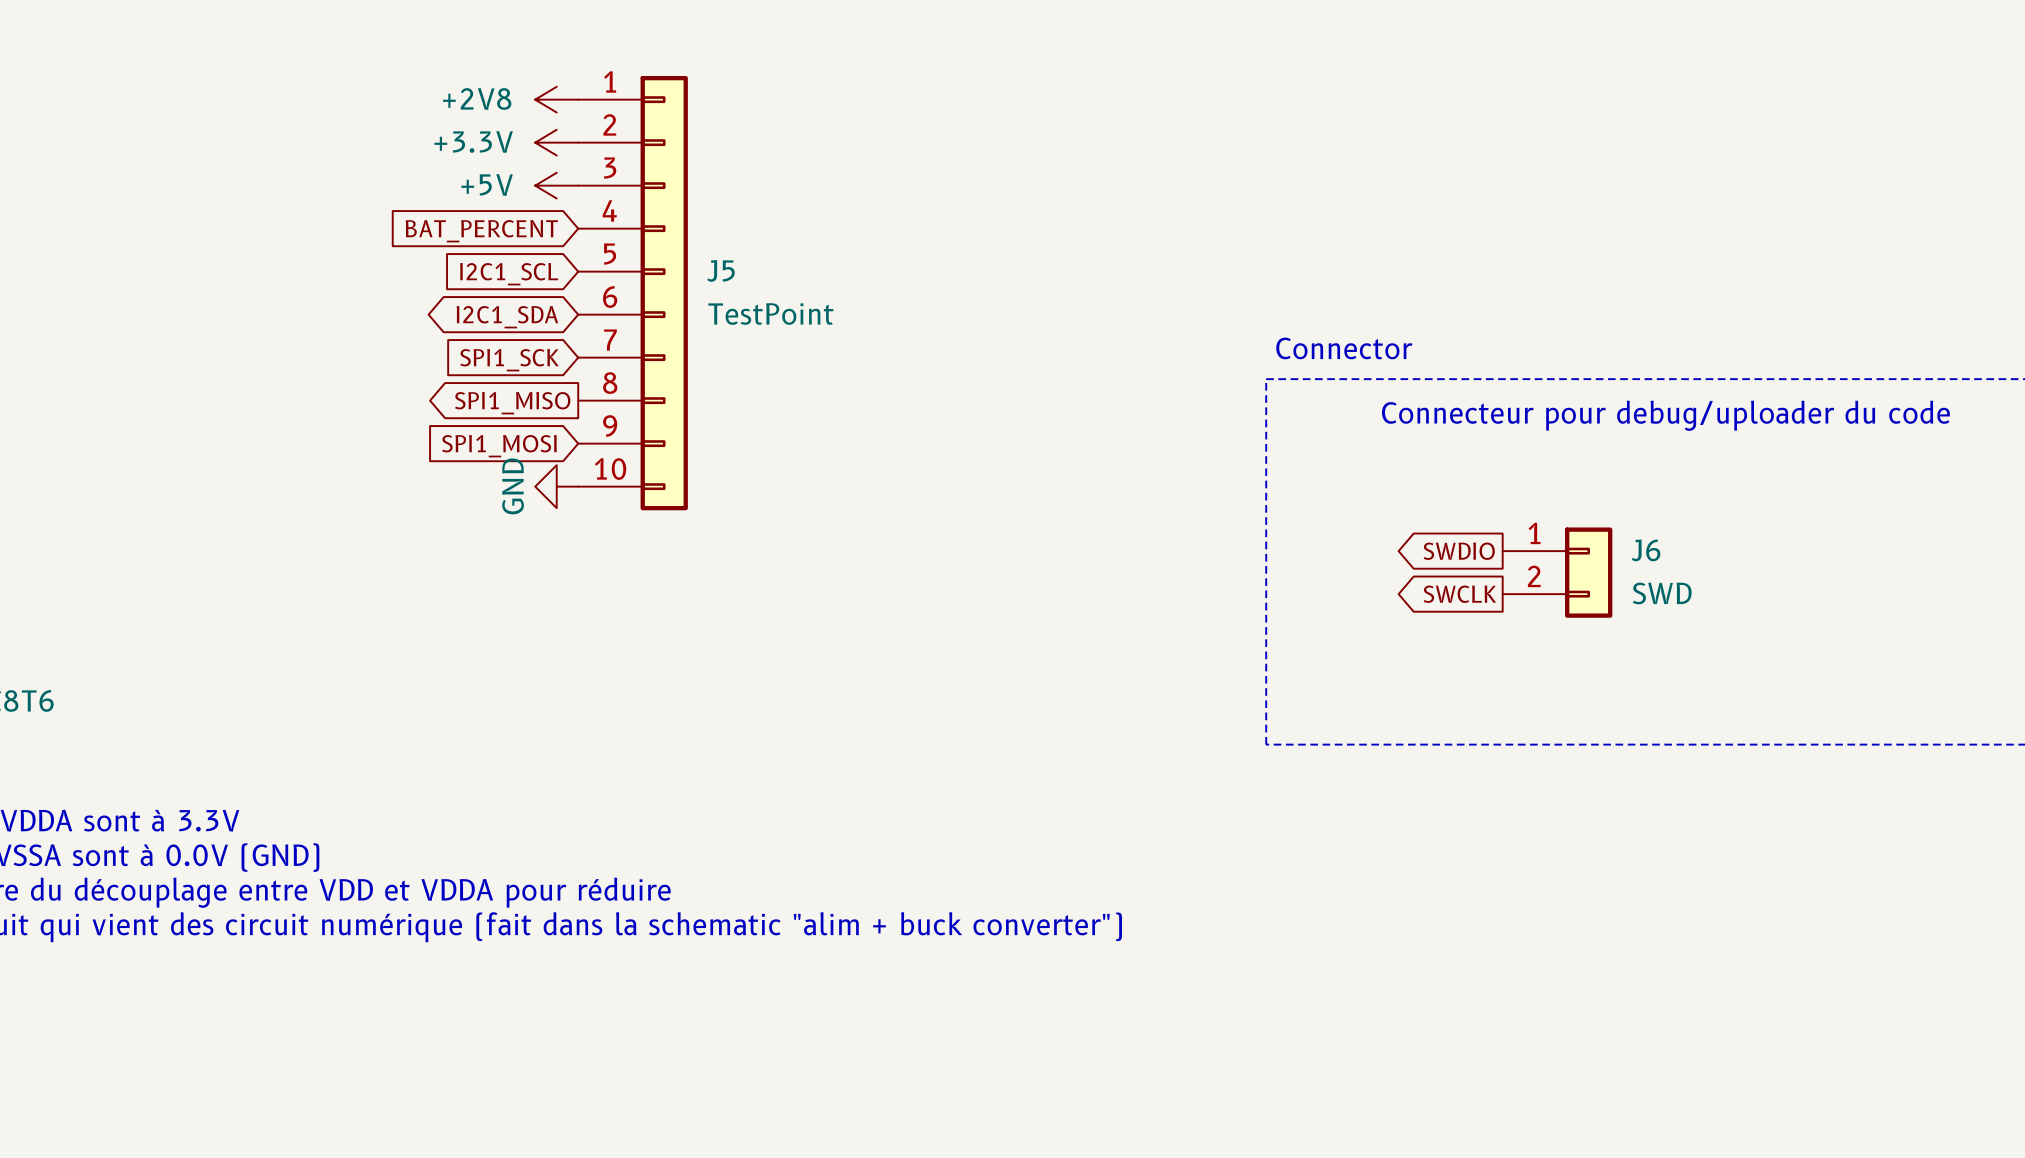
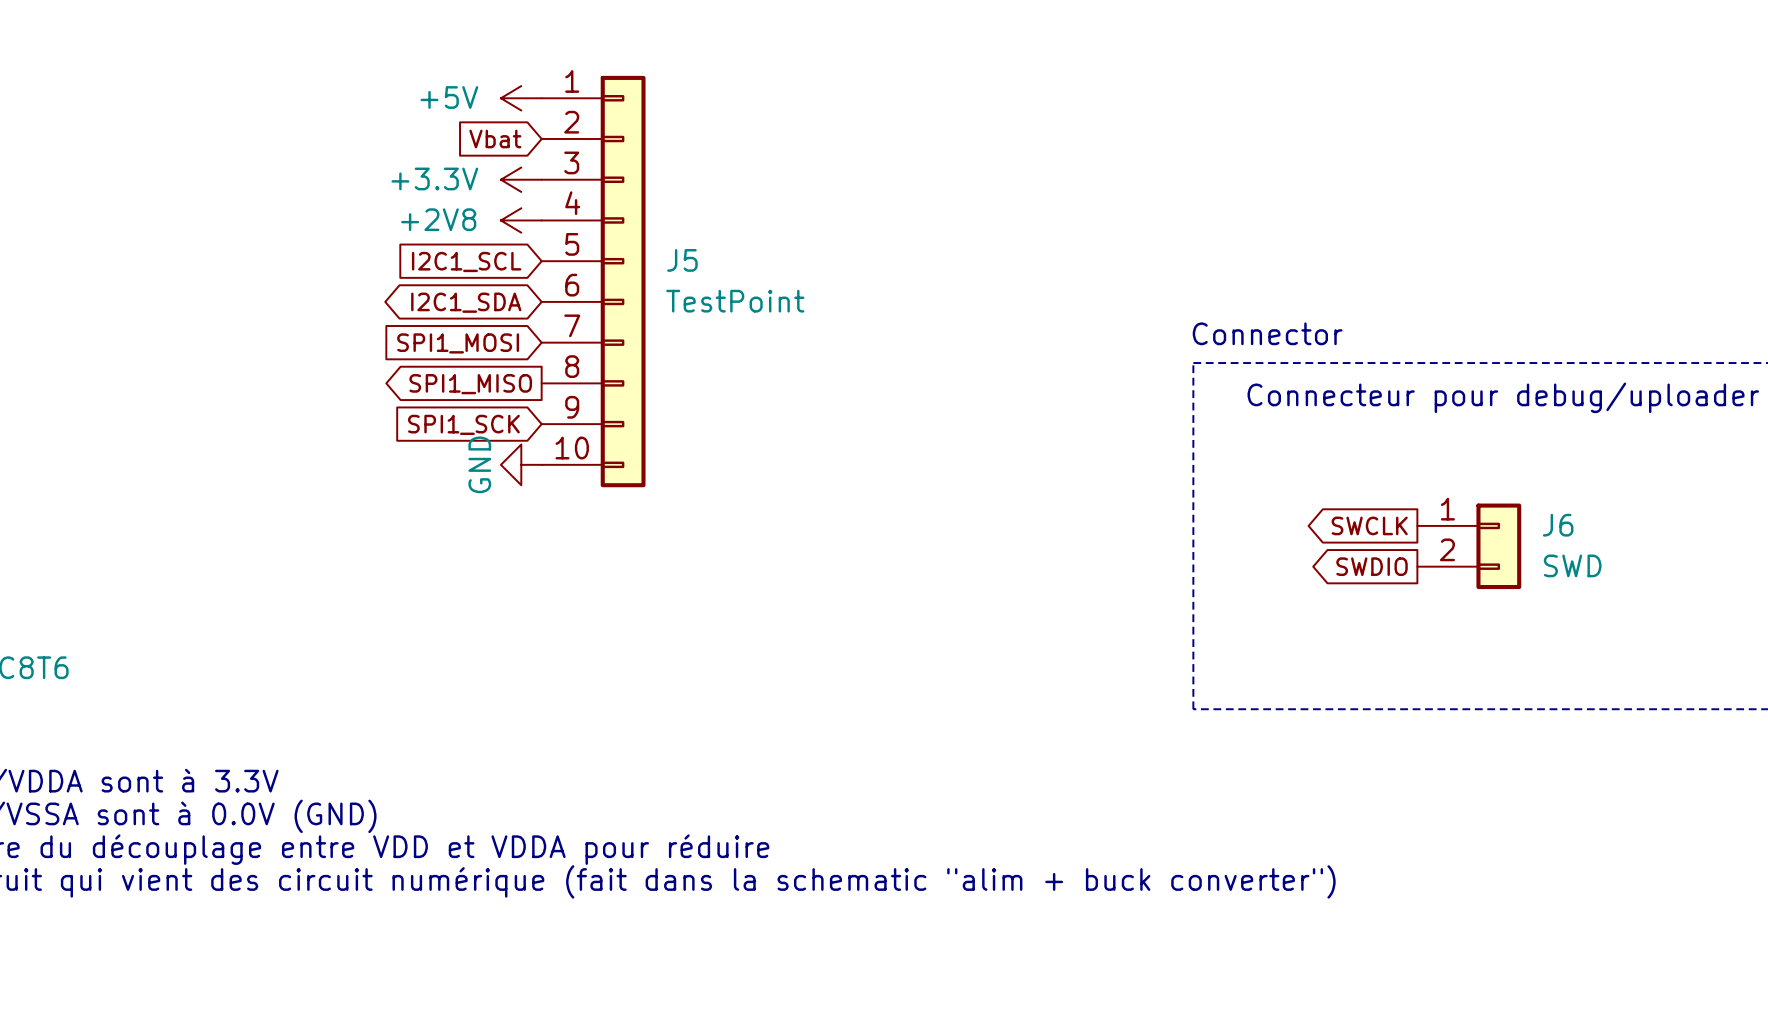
power symbol: +2V8 (556, 99) -> +5V (521, 98)
global label: none -> Vbat (495, 139)
power symbol: +3.3V (556, 142) -> none
power symbol: +5V (556, 185) -> +3.3V (521, 179)
power symbol: none -> +2V8 (521, 220)
global label: BAT_PERCENT (481, 231) -> none
global label: SPI1_SCK (509, 360) -> SPI1_MOSI (458, 343)
global label: SPI1_MOSI (499, 446) -> SPI1_SCK (463, 424)
global label: SWDIO (1459, 551) -> SWCLK (1369, 525)
global label: SWCLK (1459, 594) -> SWDIO (1372, 566)

